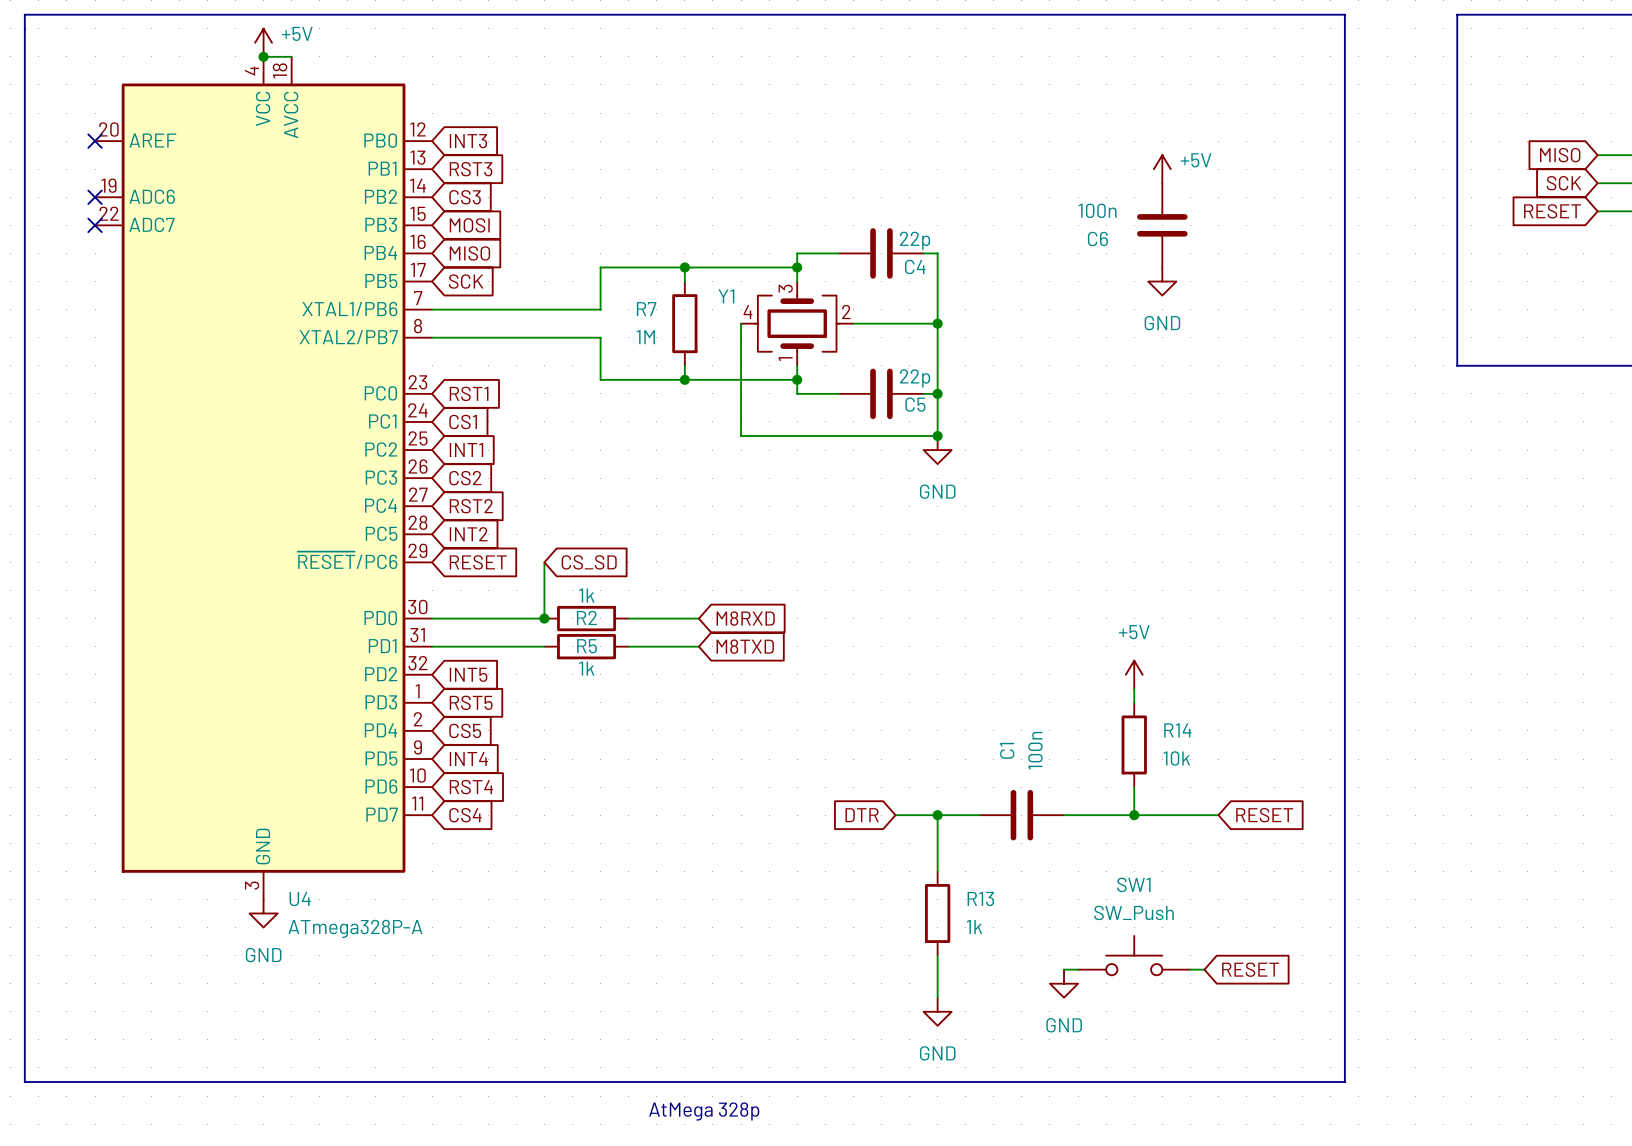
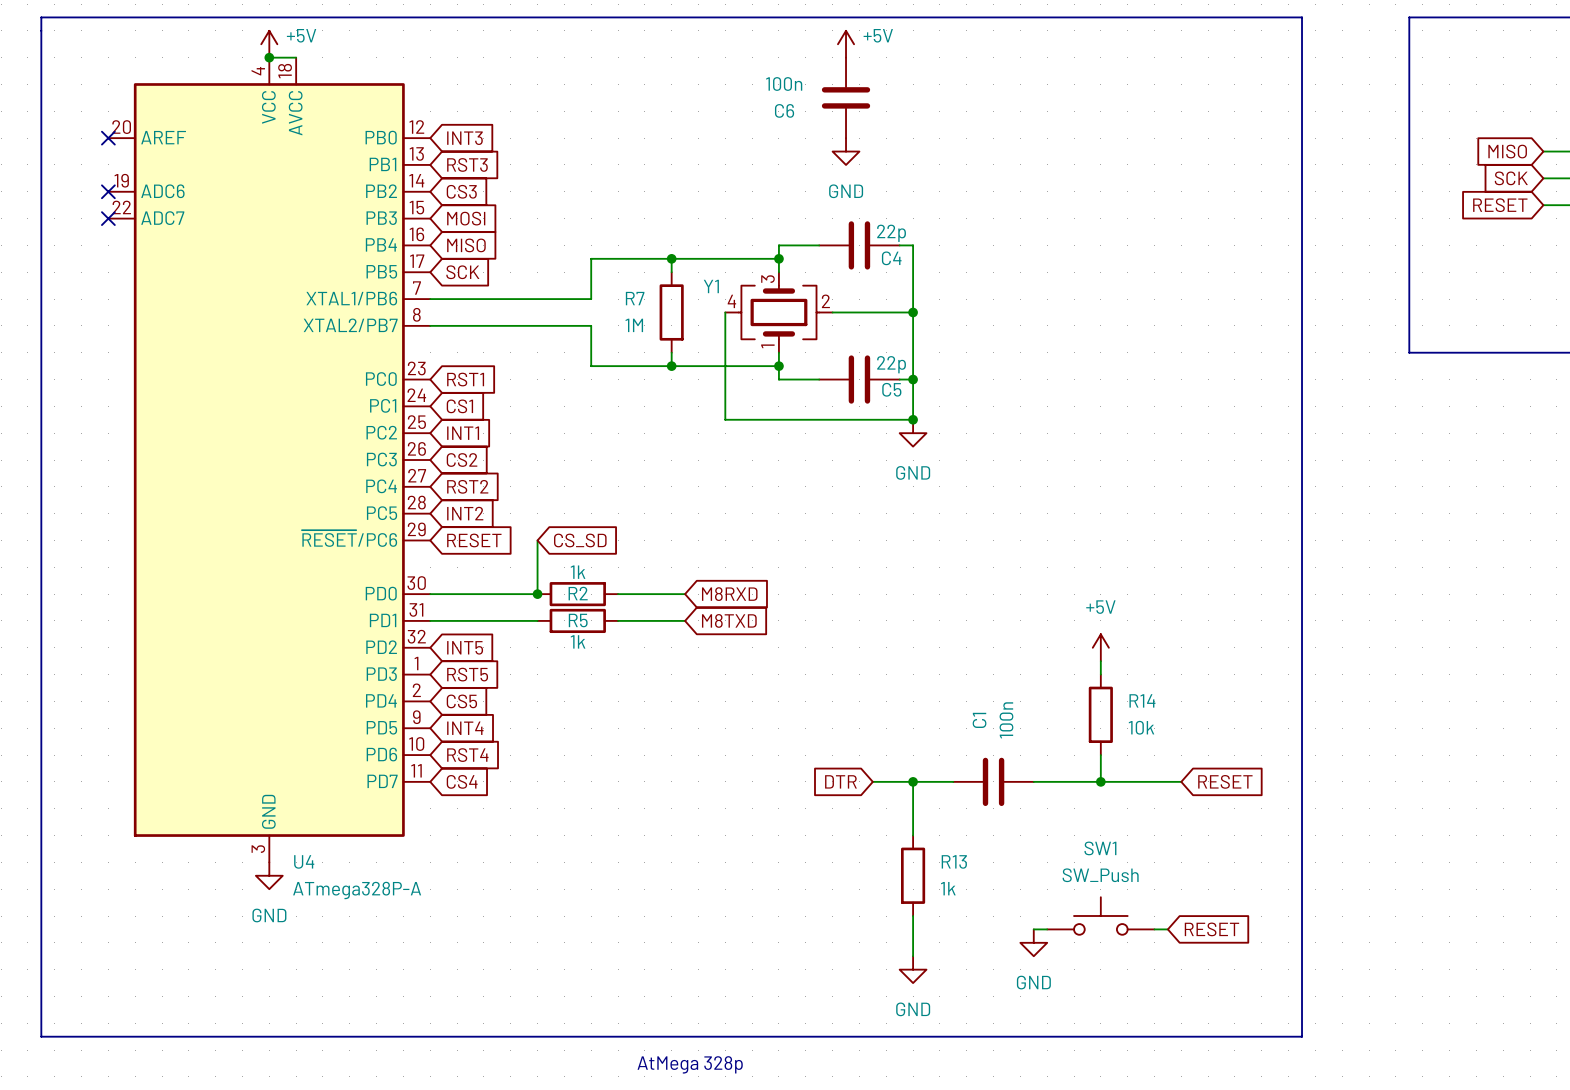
power symbol: none -> +5V (846, 44)
power symbol: none -> GND (846, 151)
power symbol: +5V (1162, 169) -> none
C6 position: (1162, 225) -> (846, 97)
power symbol: GND (1162, 281) -> none

